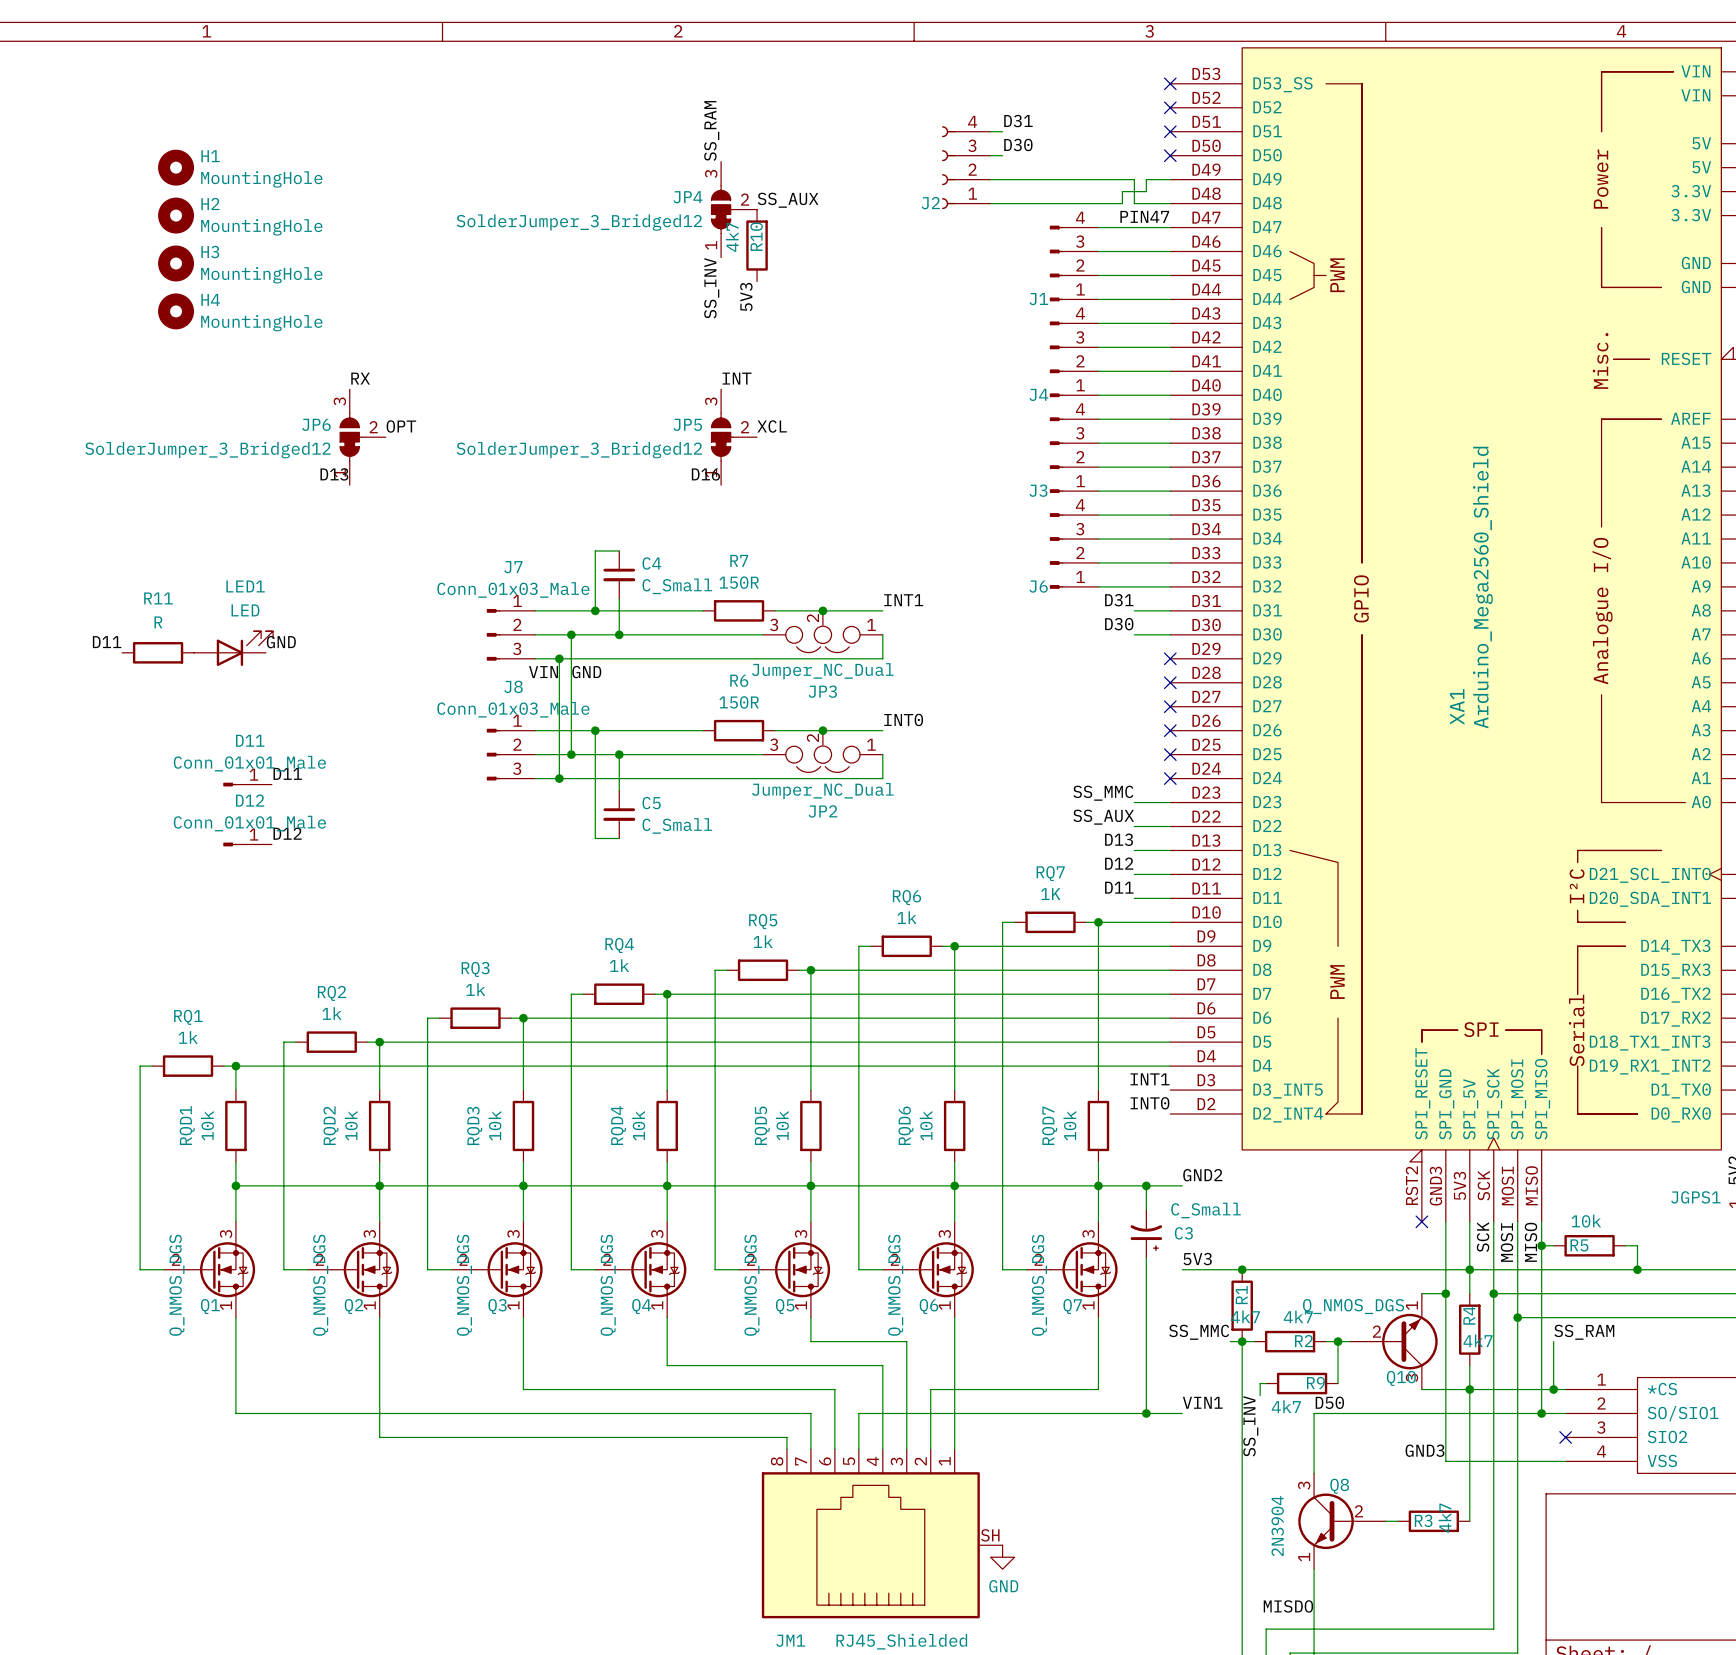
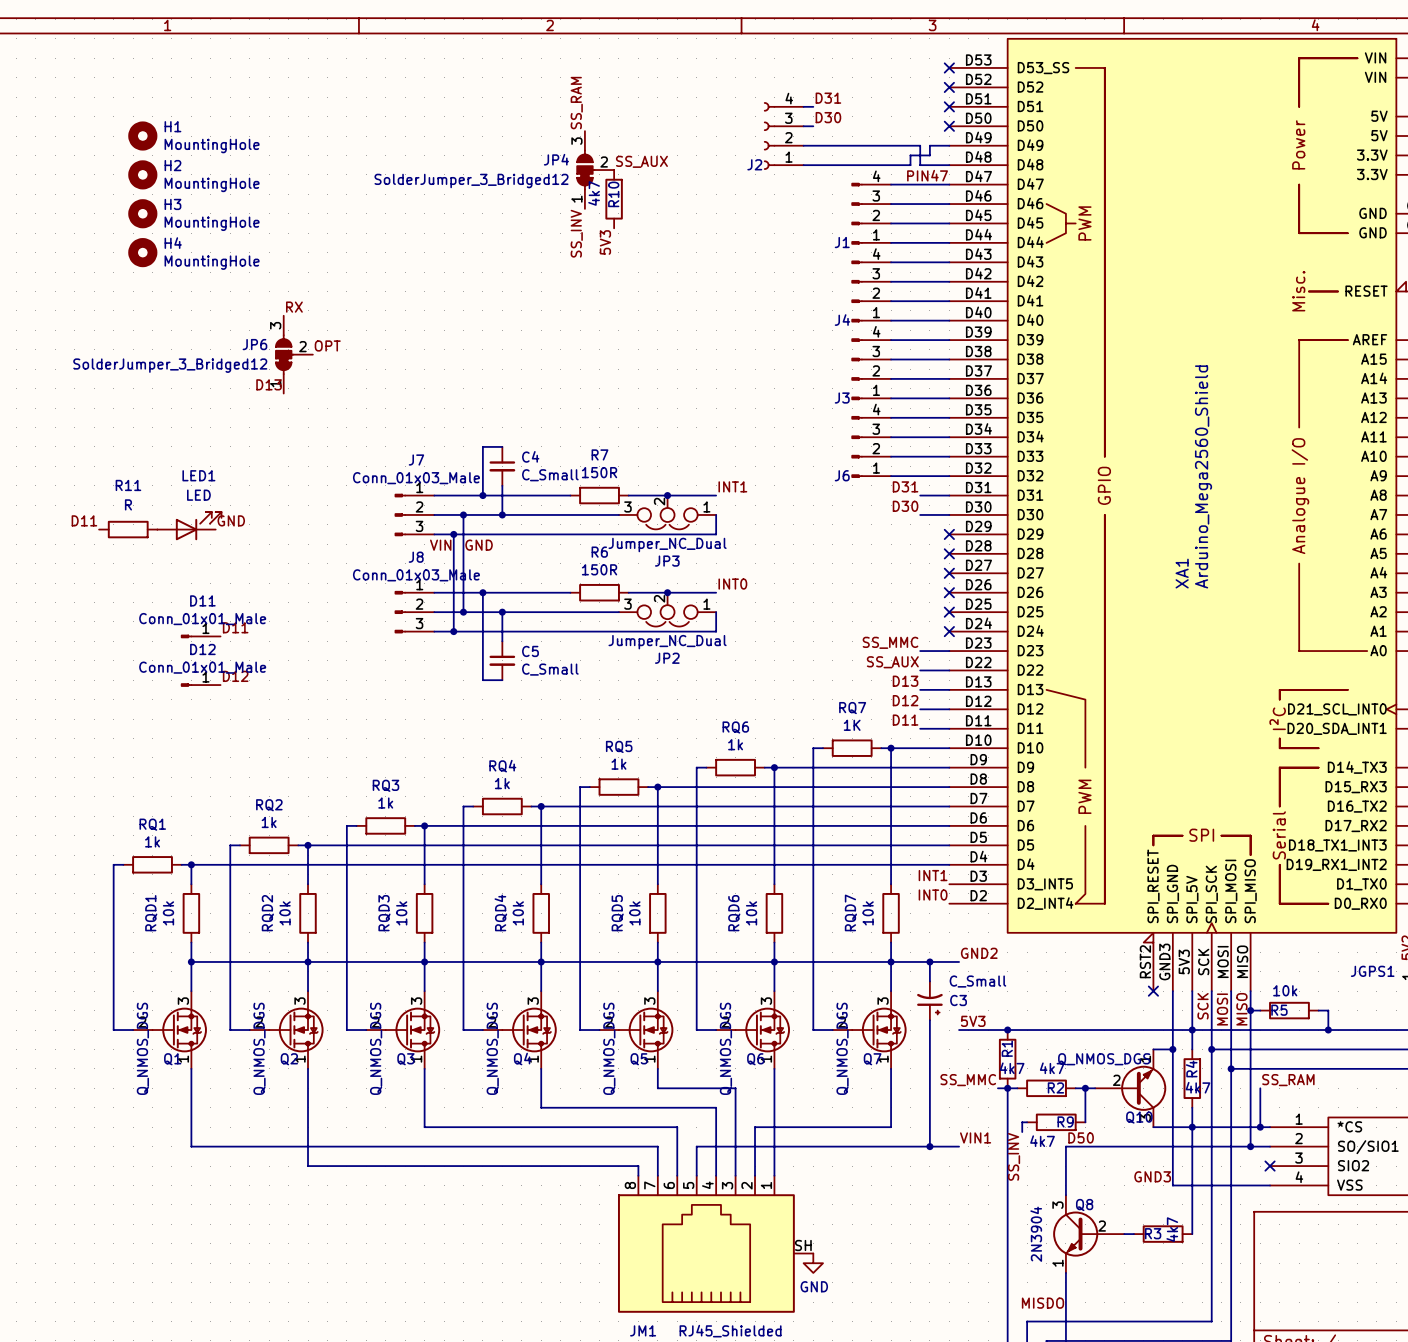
label: INT (737, 378) -> none
label: XCL (772, 426) -> none
JP5: SolderJumper_3_Bridged12 (734, 437) -> none
label: D16 (705, 474) -> none

